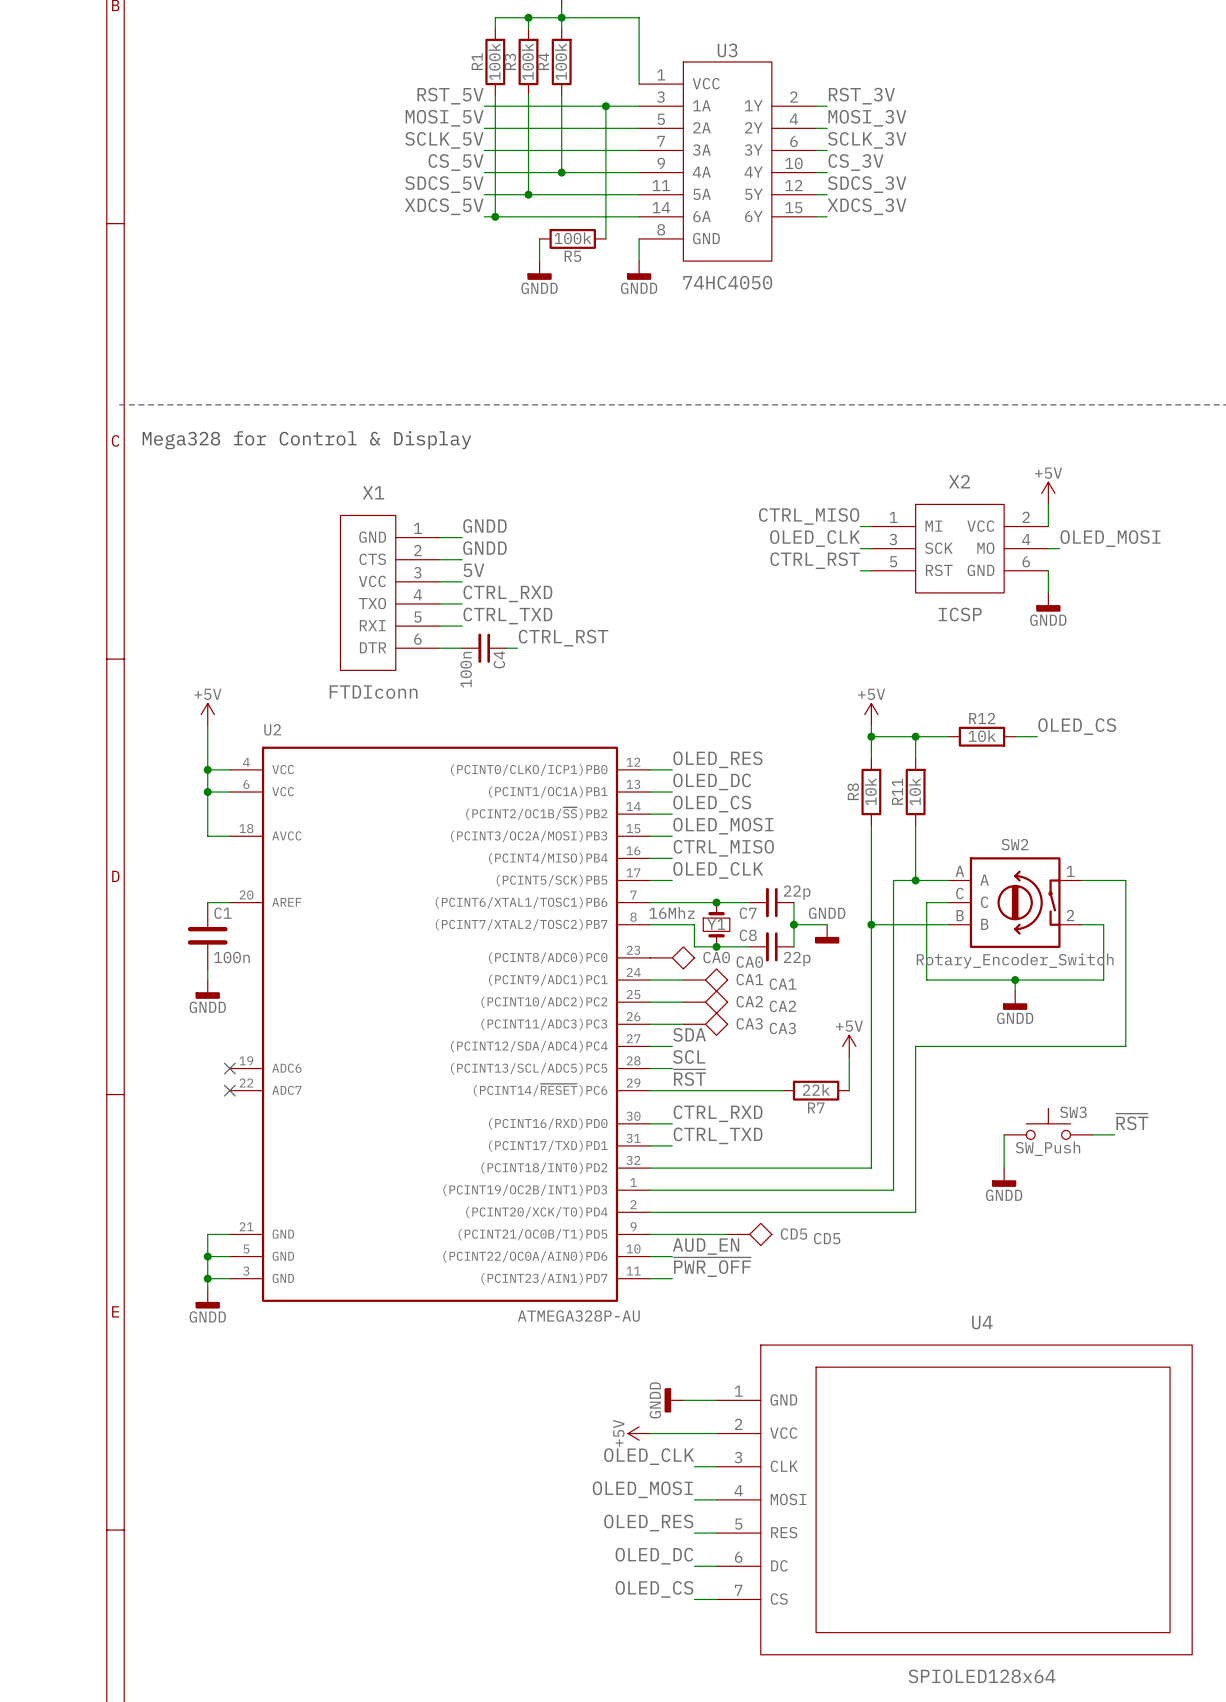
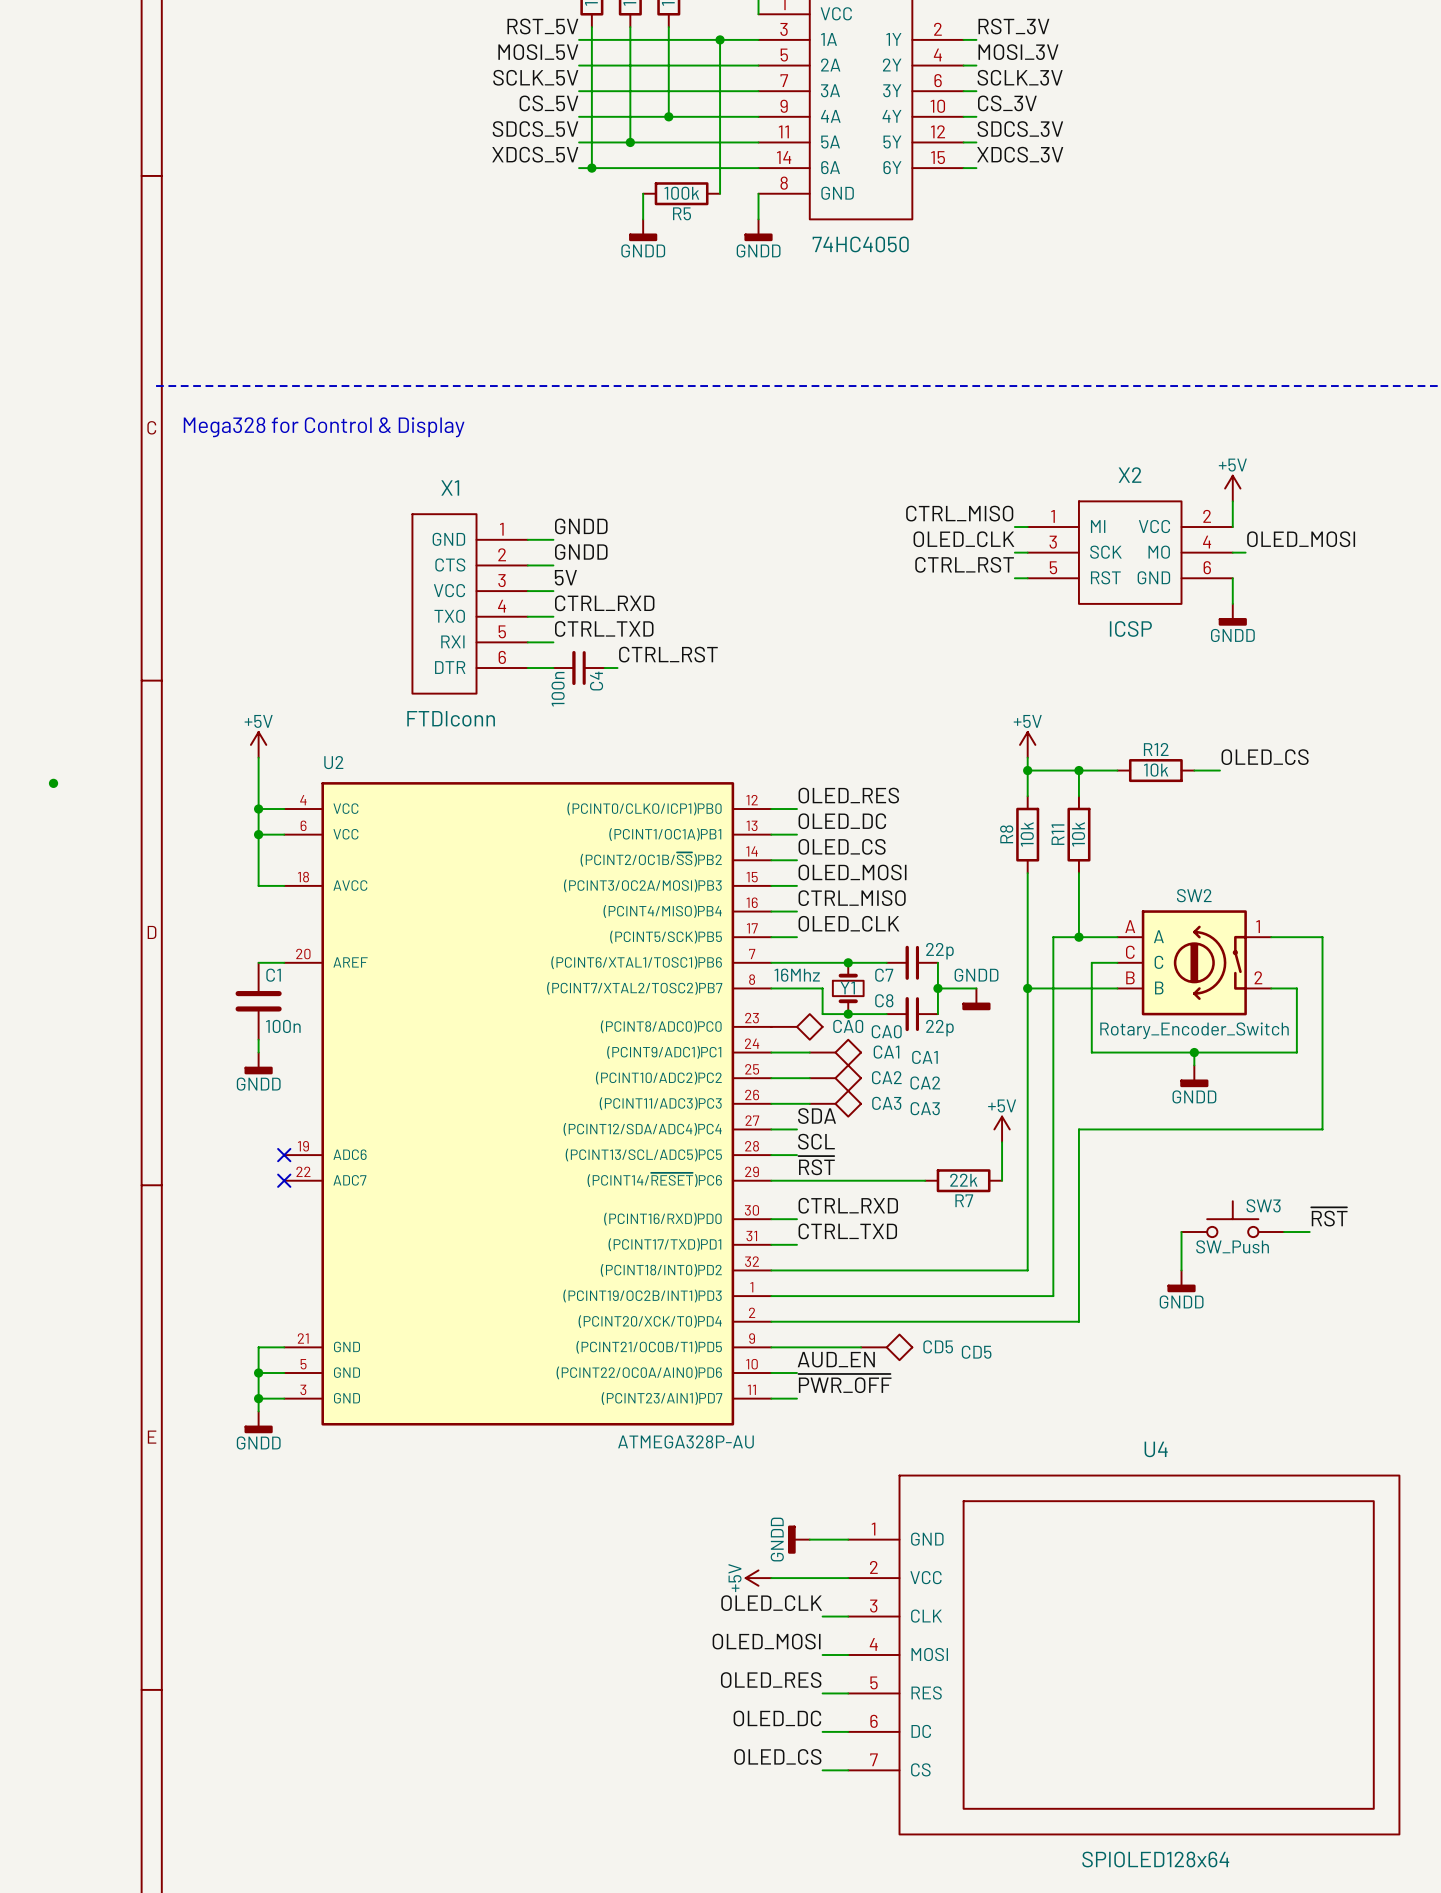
junction: none -> (53, 783)

